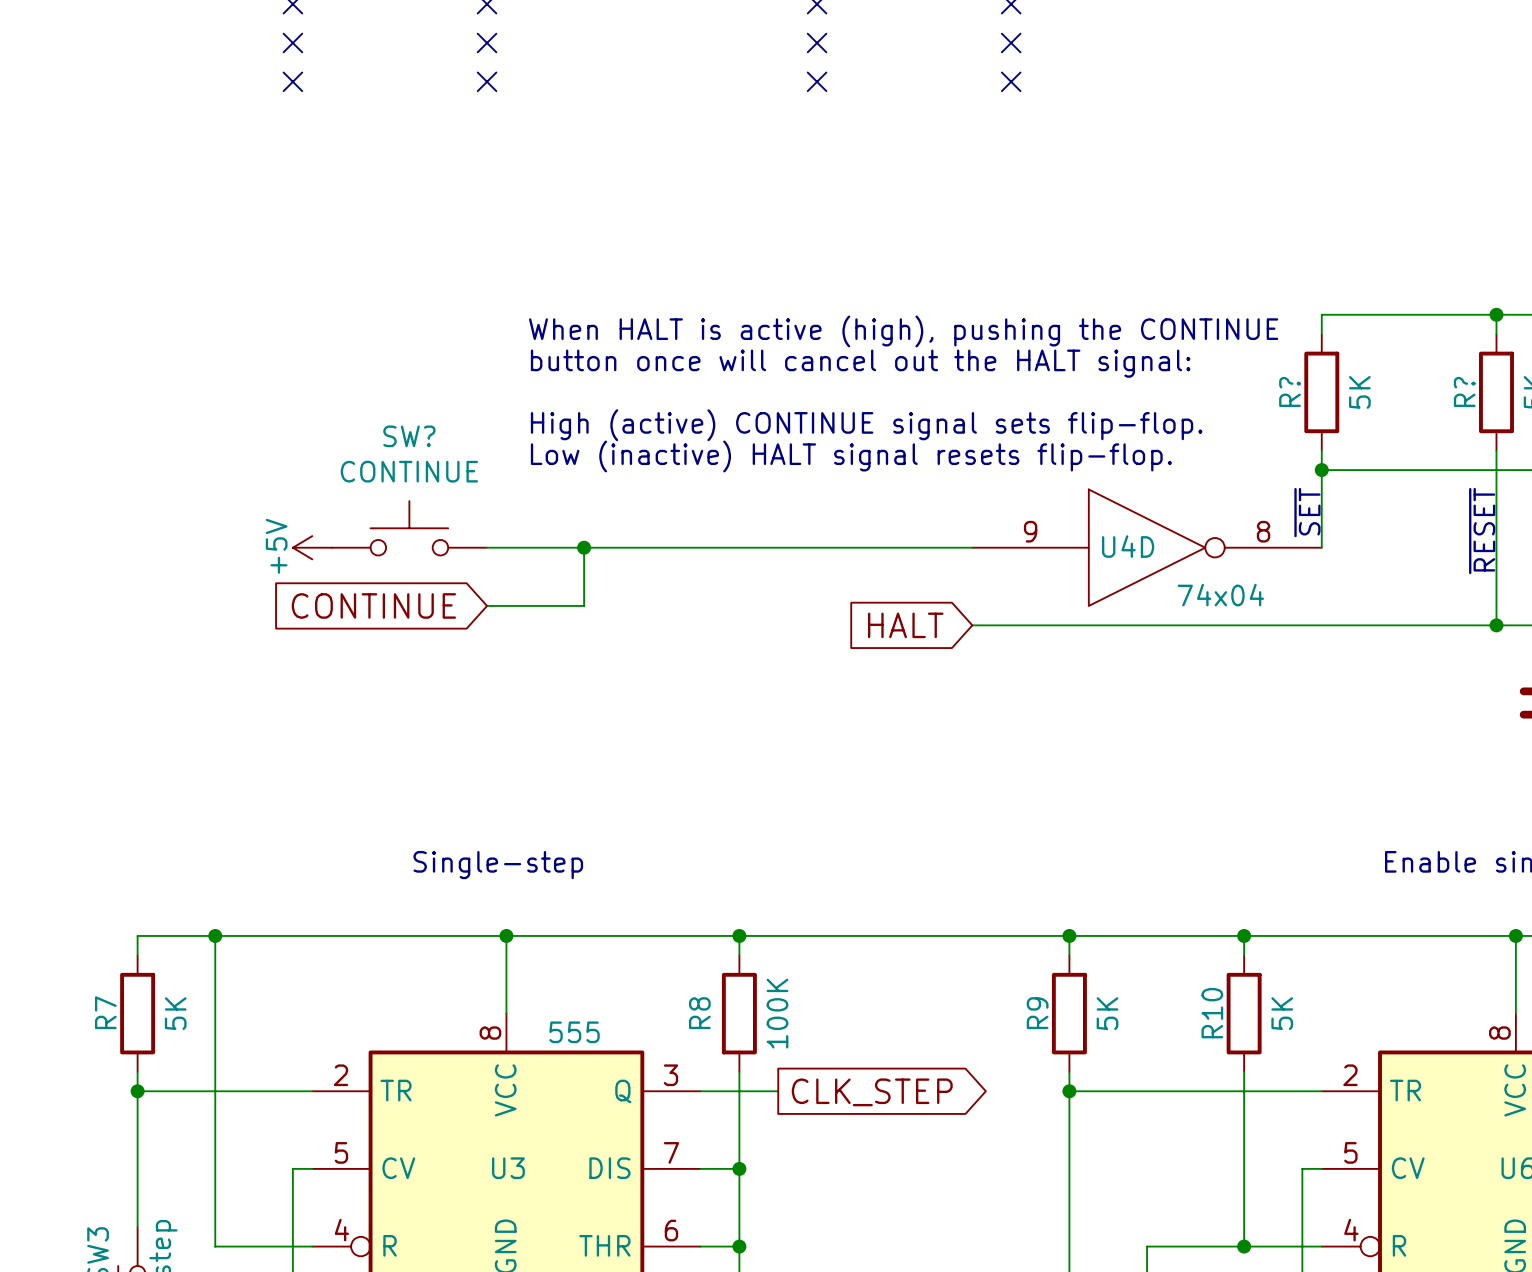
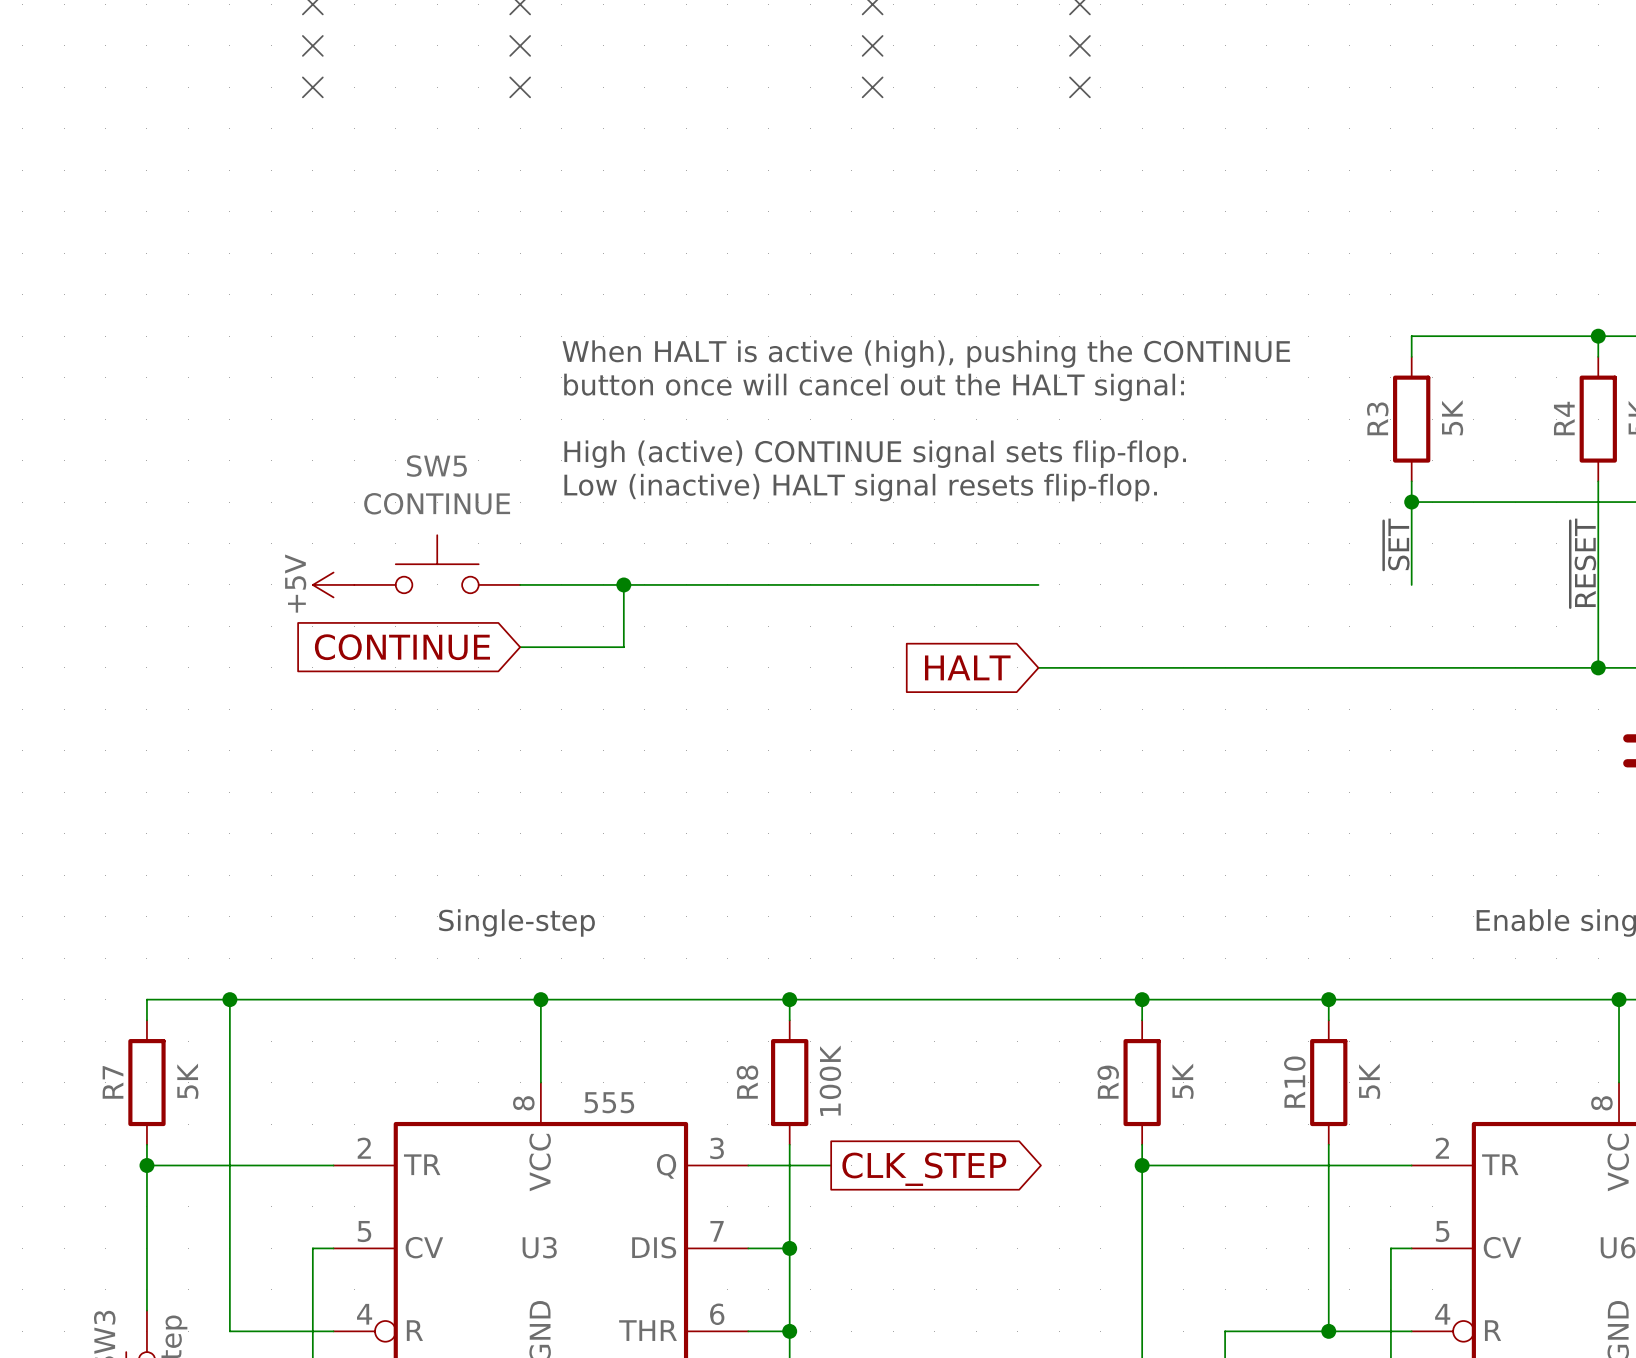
R? name: R? (1289, 391) -> R3 (1377, 418)
R? name: R? (1464, 391) -> R4 (1564, 418)
SW? name: SW? (409, 436) -> SW5 (436, 466)
U4D: 74x04 (1147, 547) -> none

